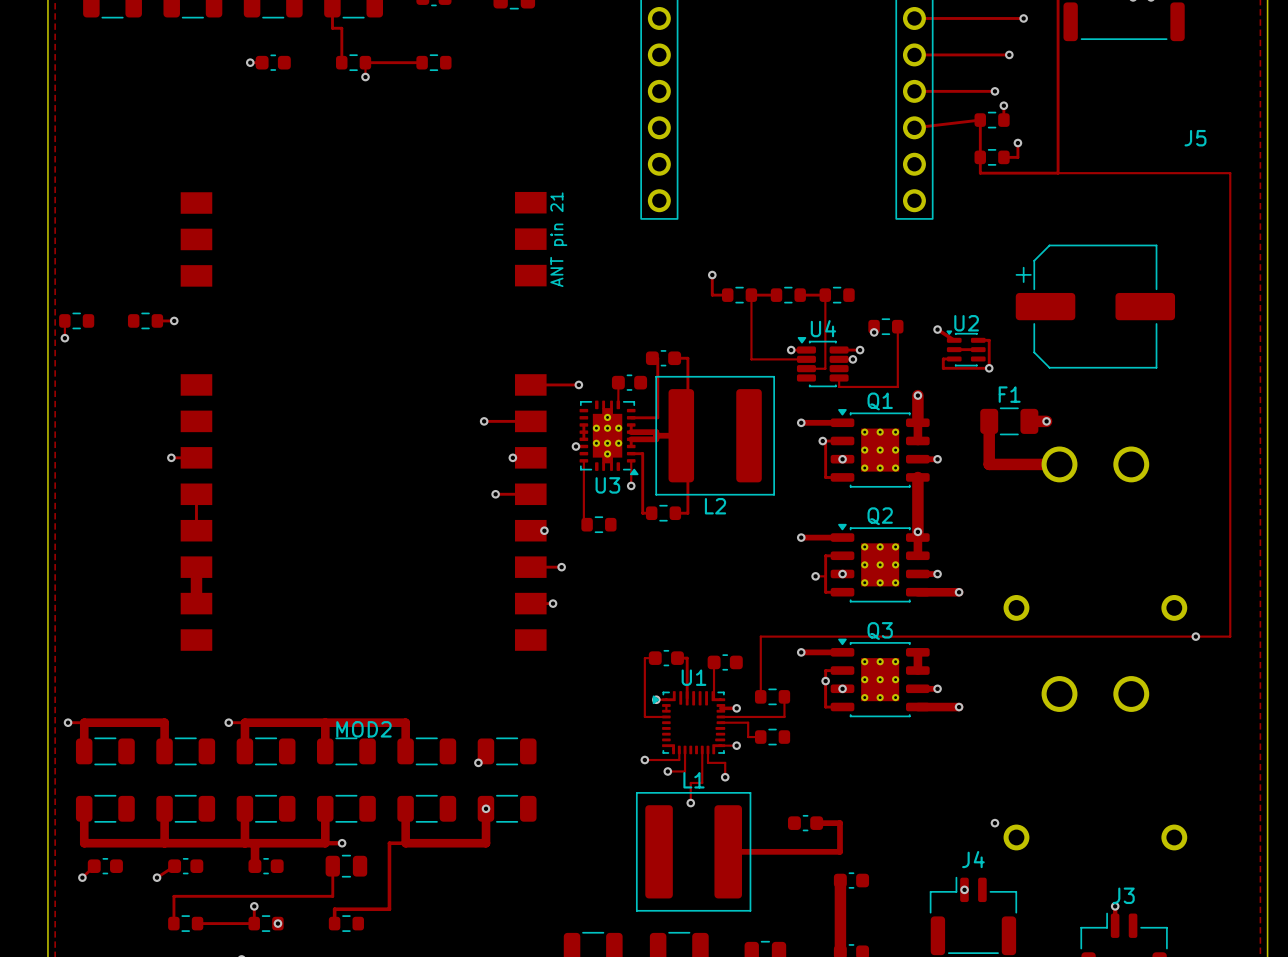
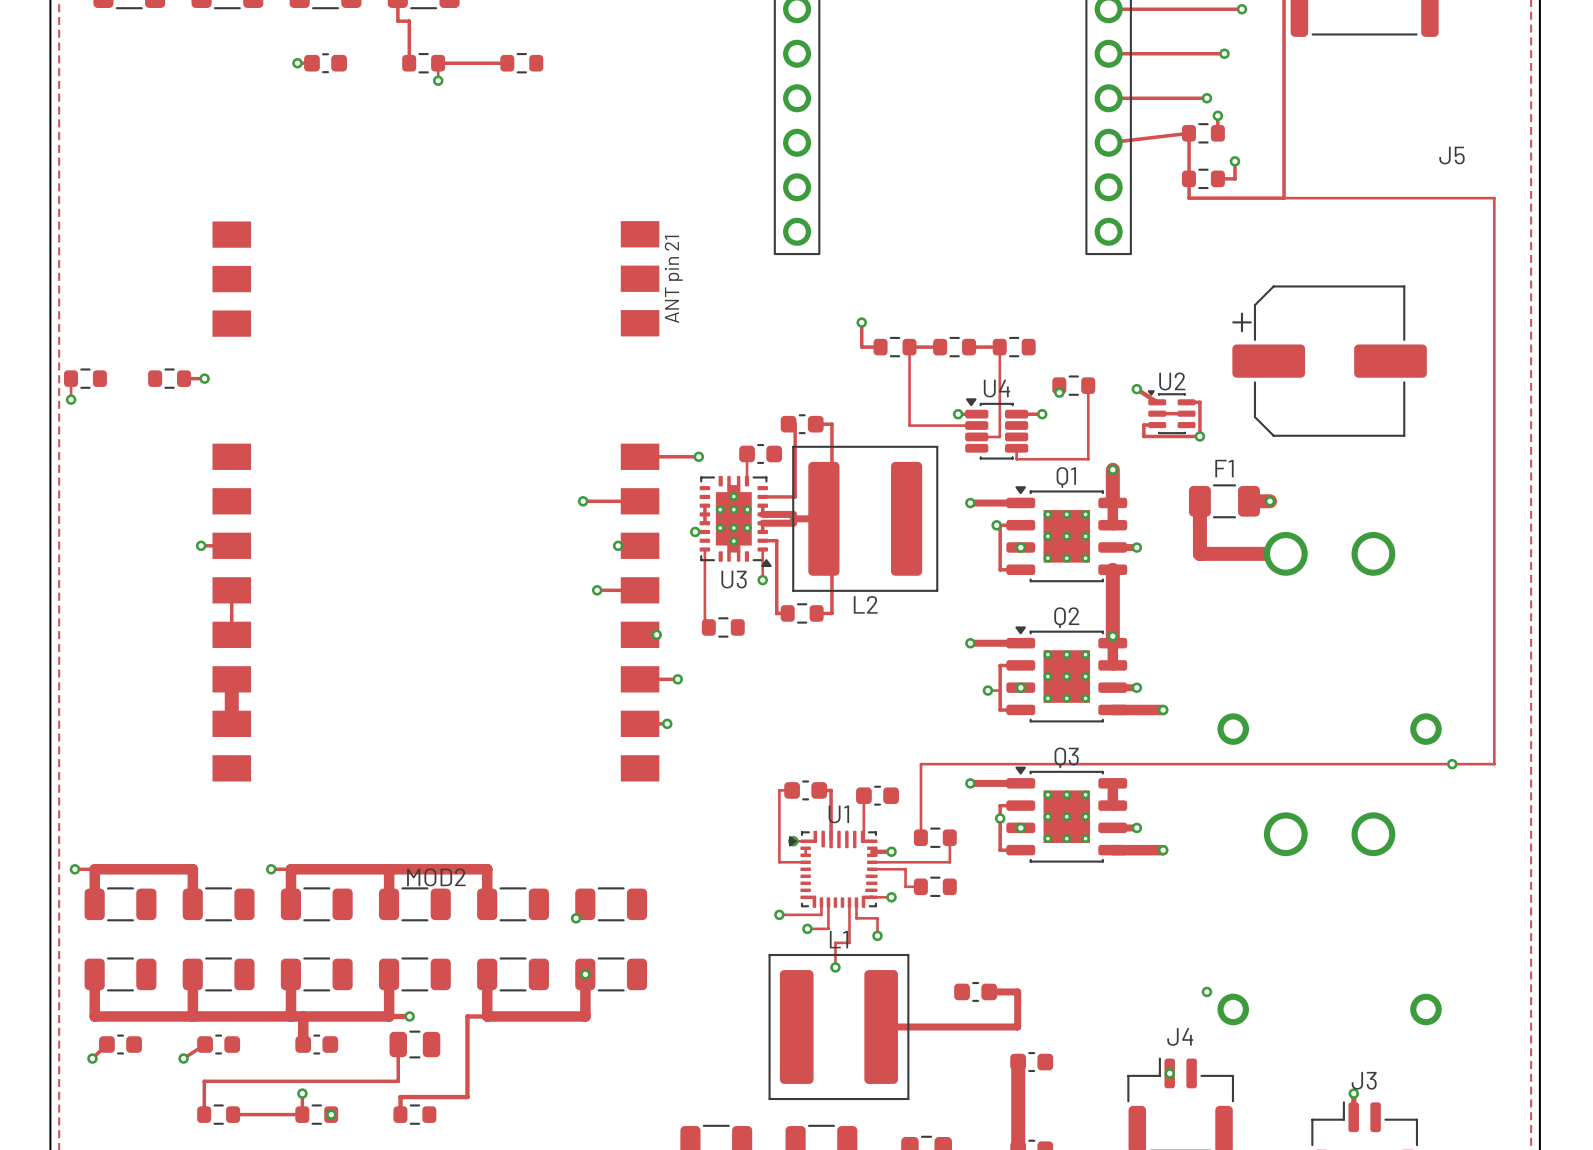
via: (852, 359) -> none

